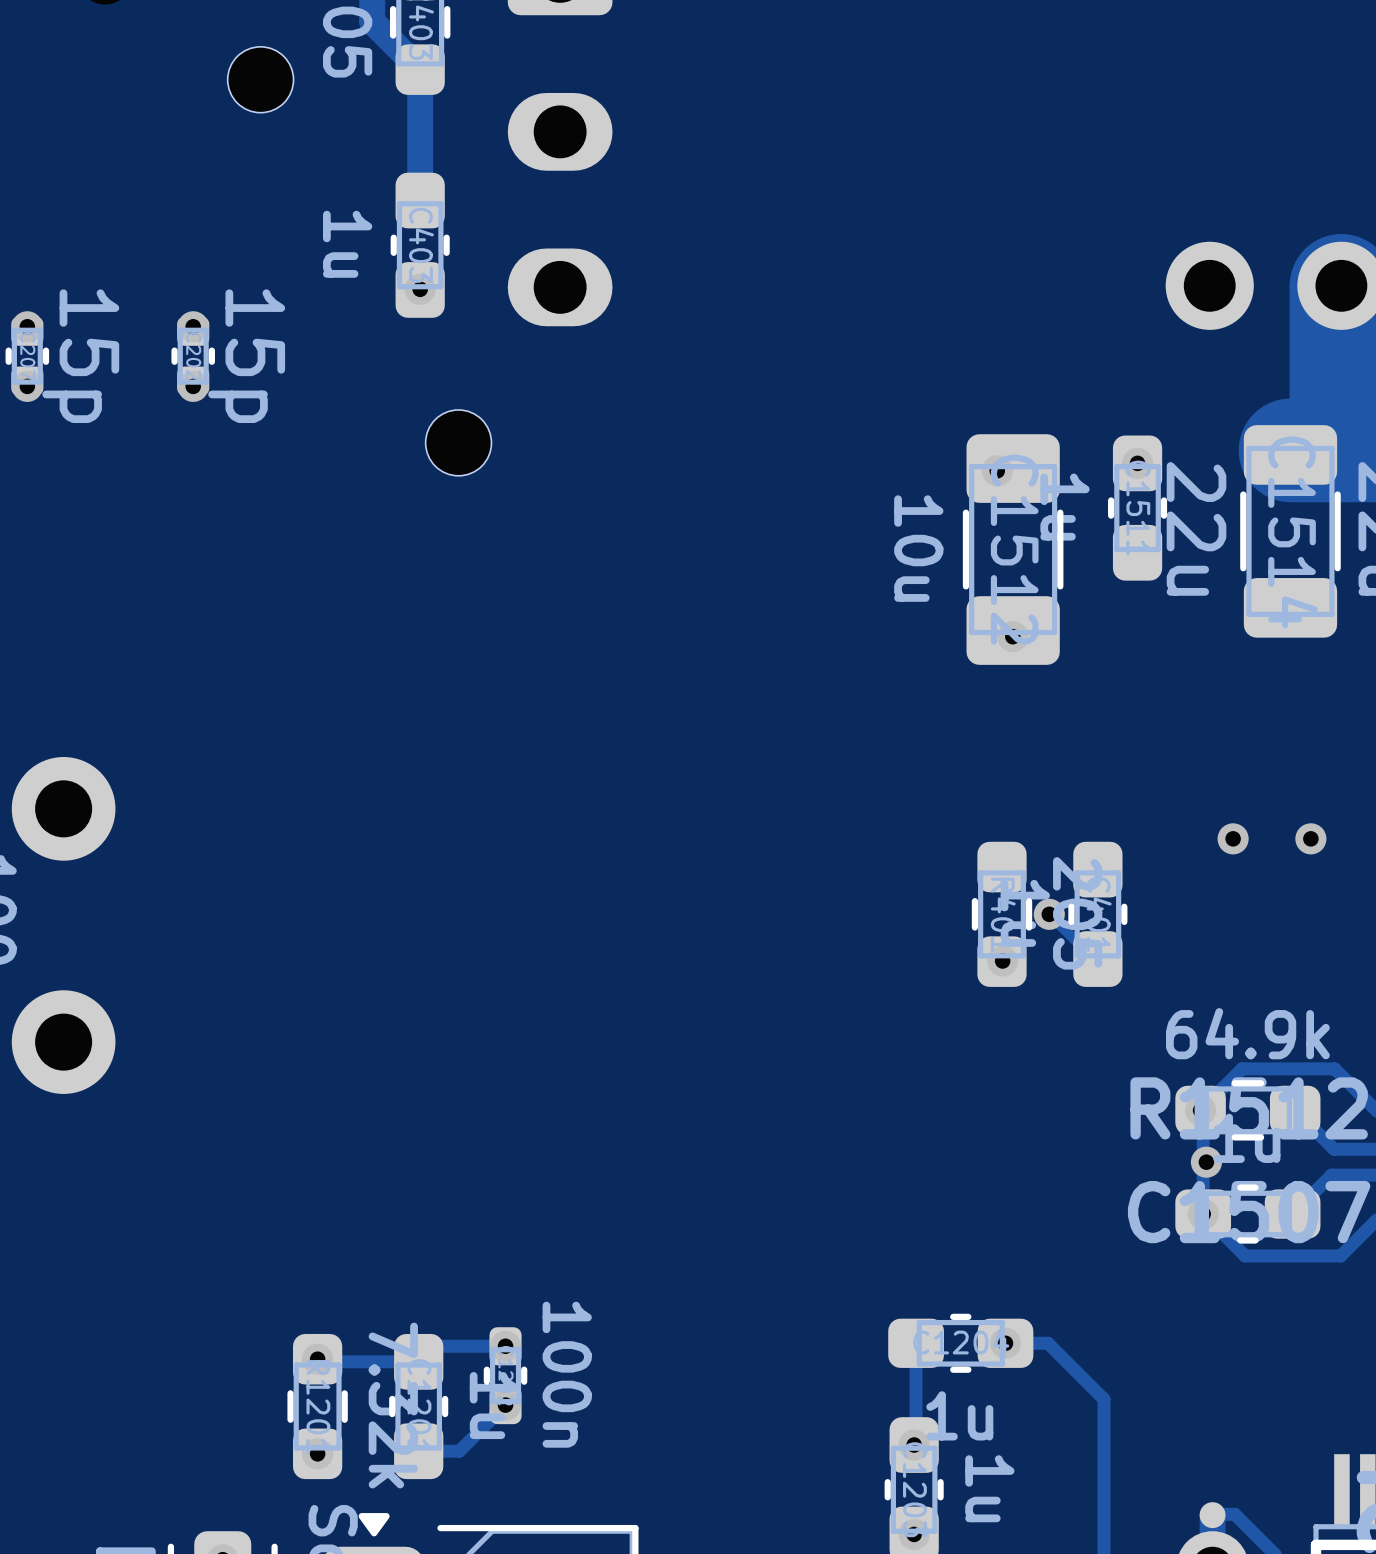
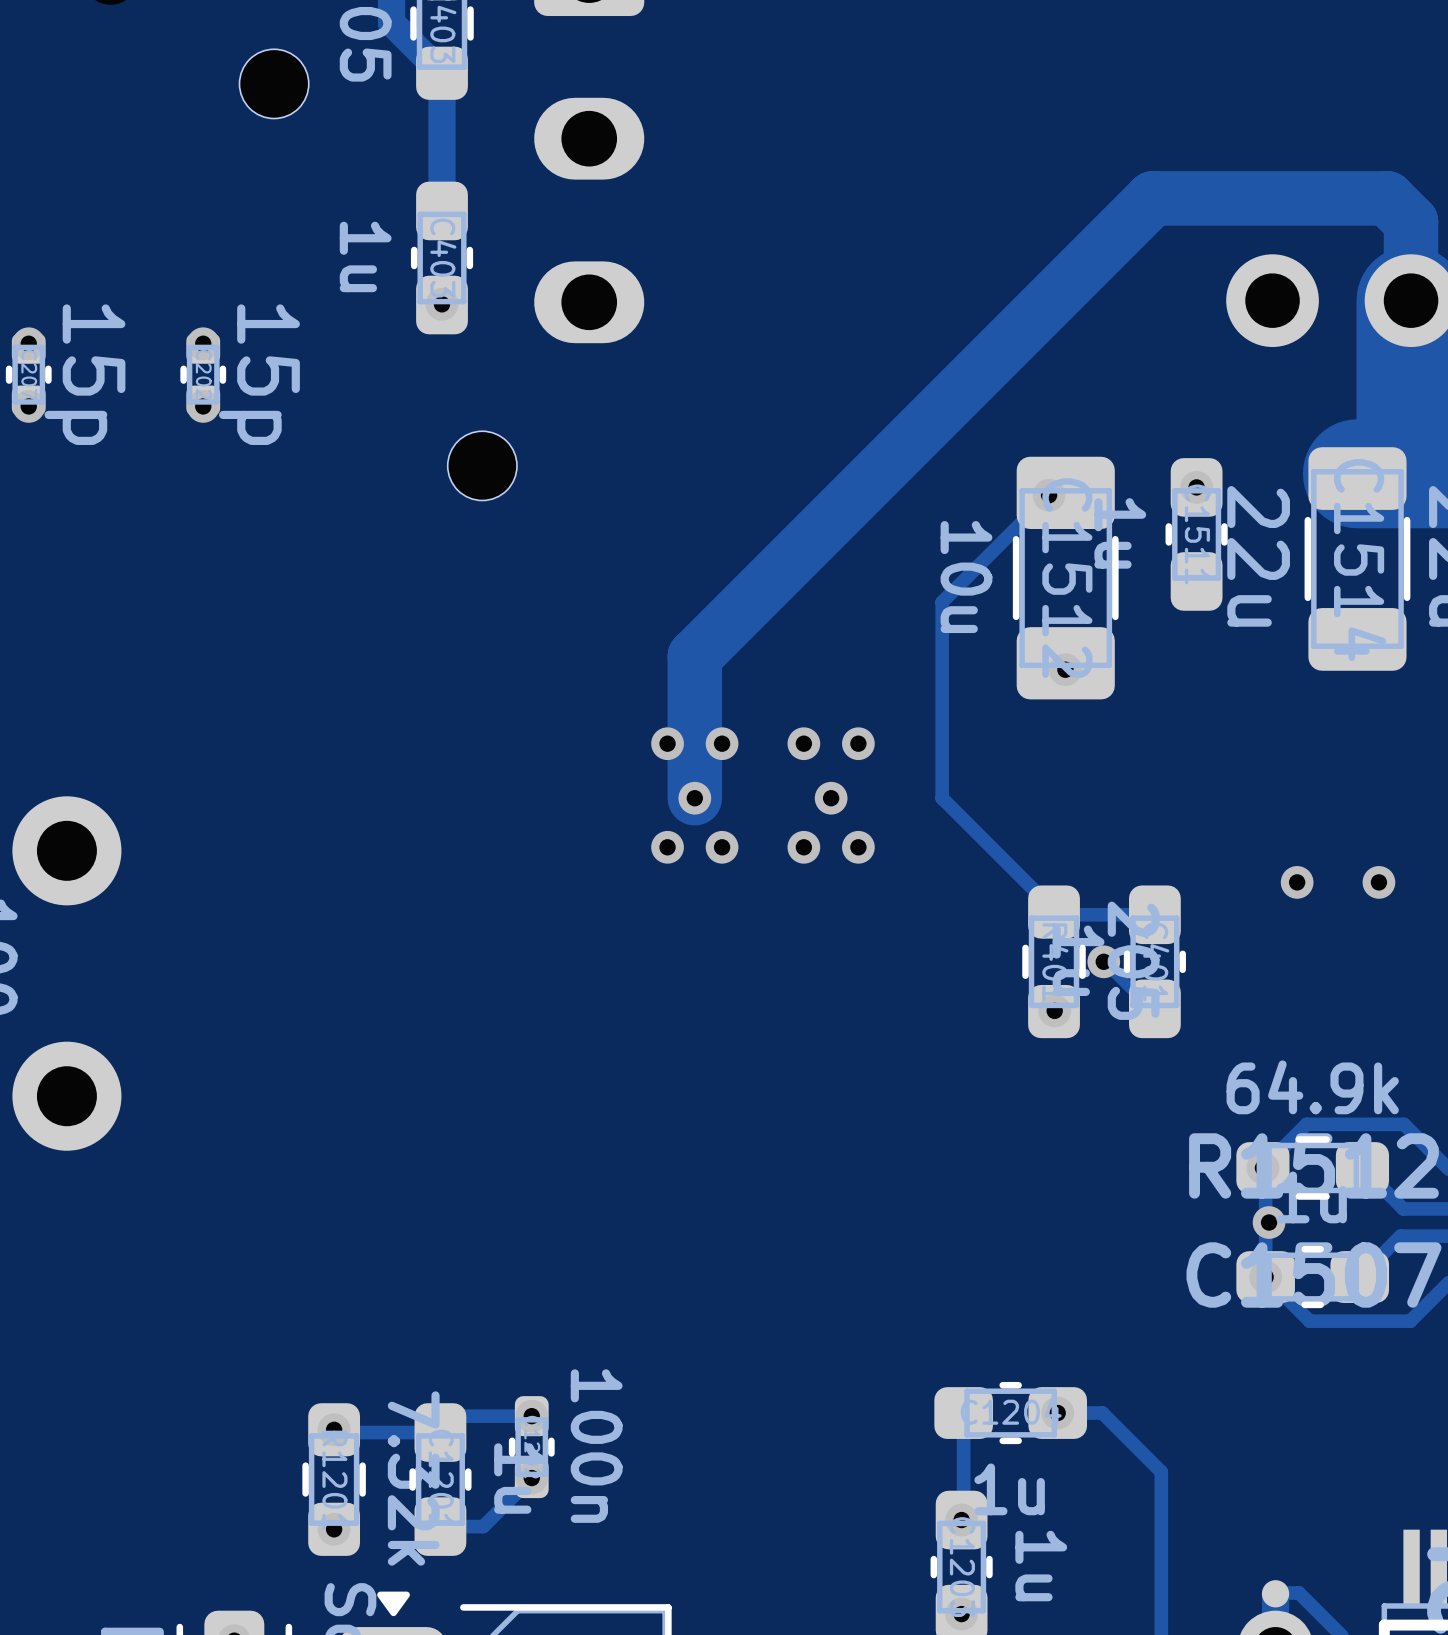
track: none -> (1411, 300) (1411, 222) (1387, 198) (1152, 198) (694, 656) (694, 798)
track: none -> (1049, 495) (942, 602) (942, 798) (1056, 914) (1154, 914)
via: none -> (667, 743)
via: none -> (722, 743)
via: none -> (803, 743)
via: none -> (858, 743)
via: none -> (694, 798)
via: none -> (831, 798)
via: none -> (667, 847)
via: none -> (722, 847)
via: none -> (803, 847)
via: none -> (858, 847)

